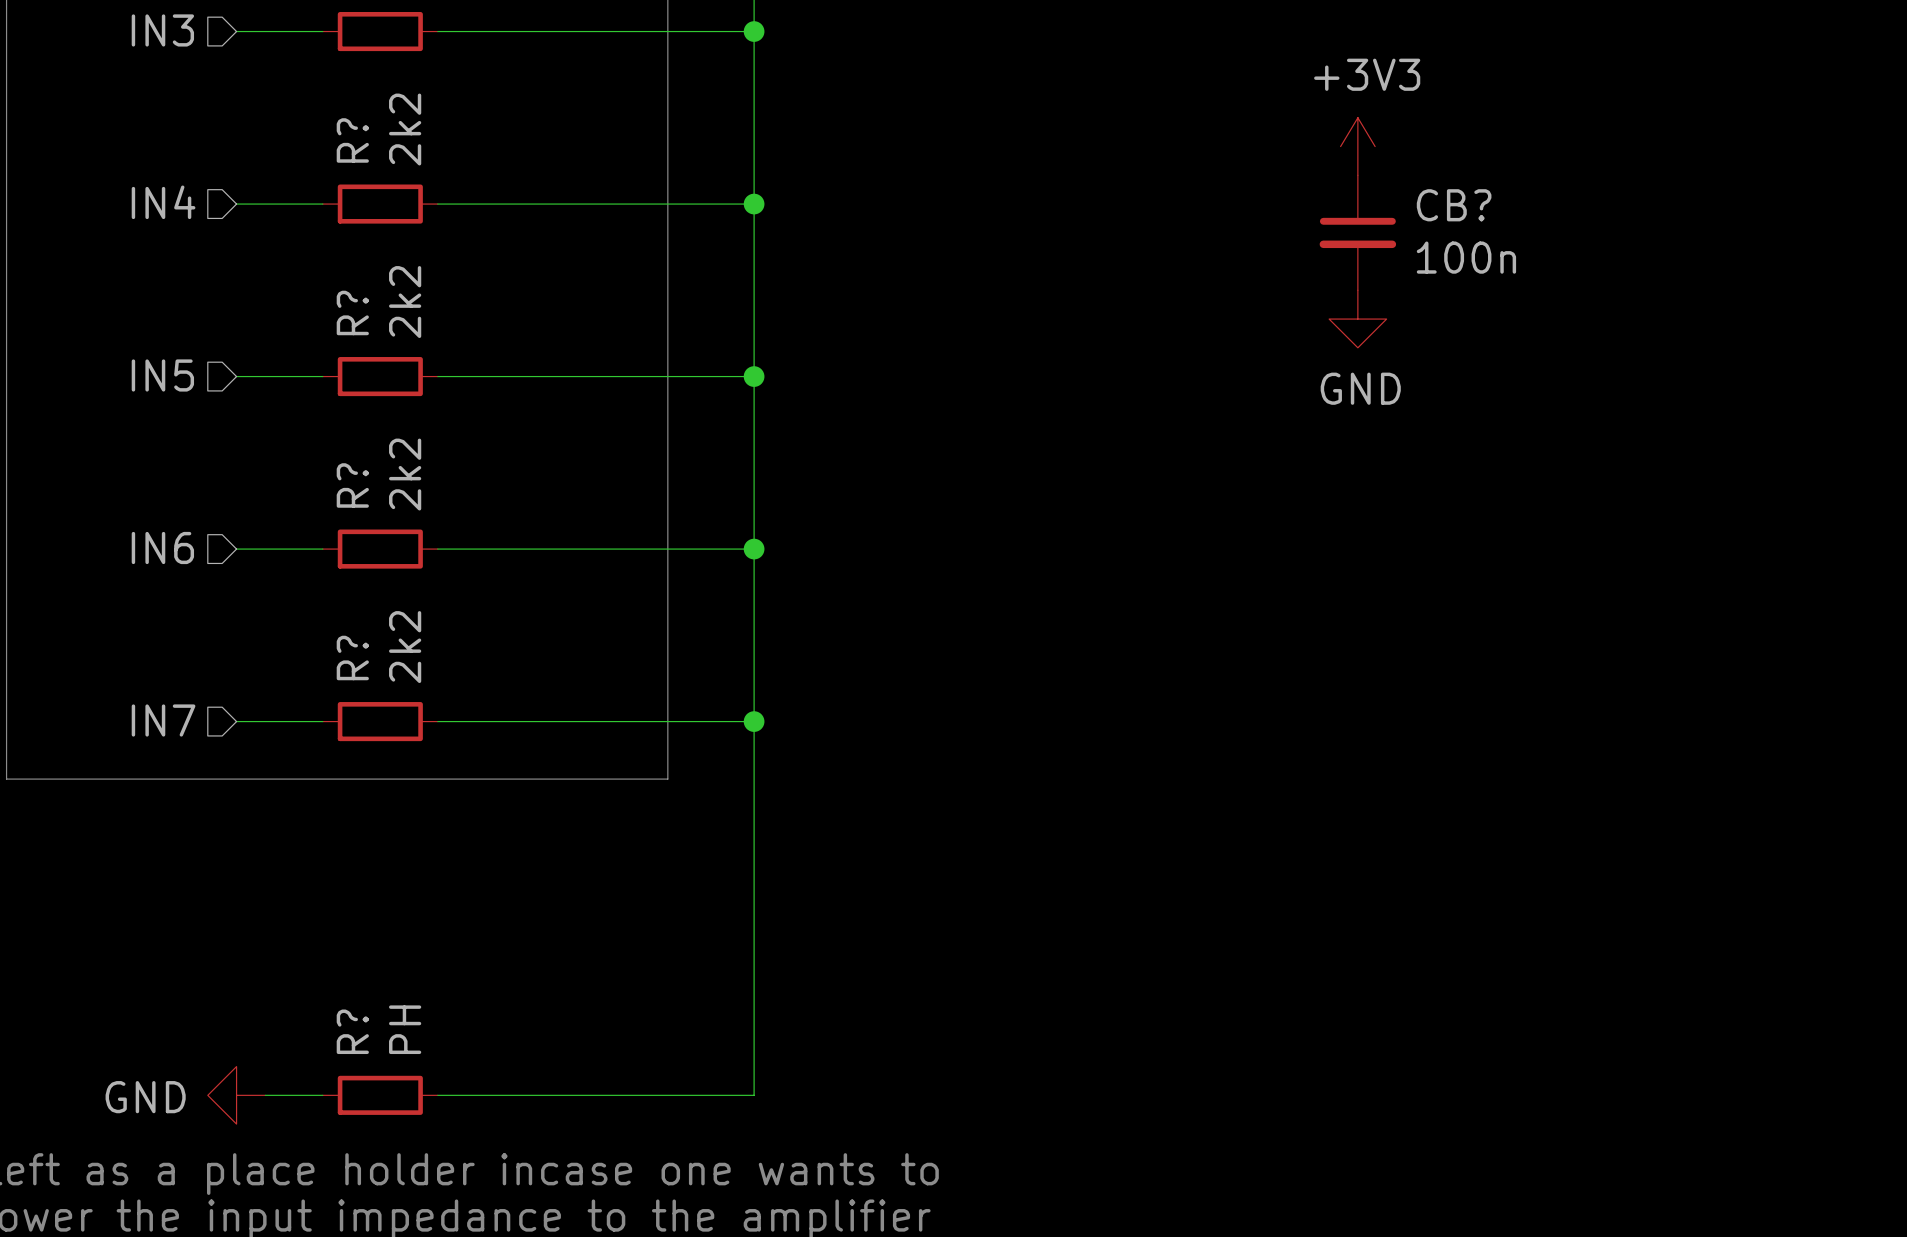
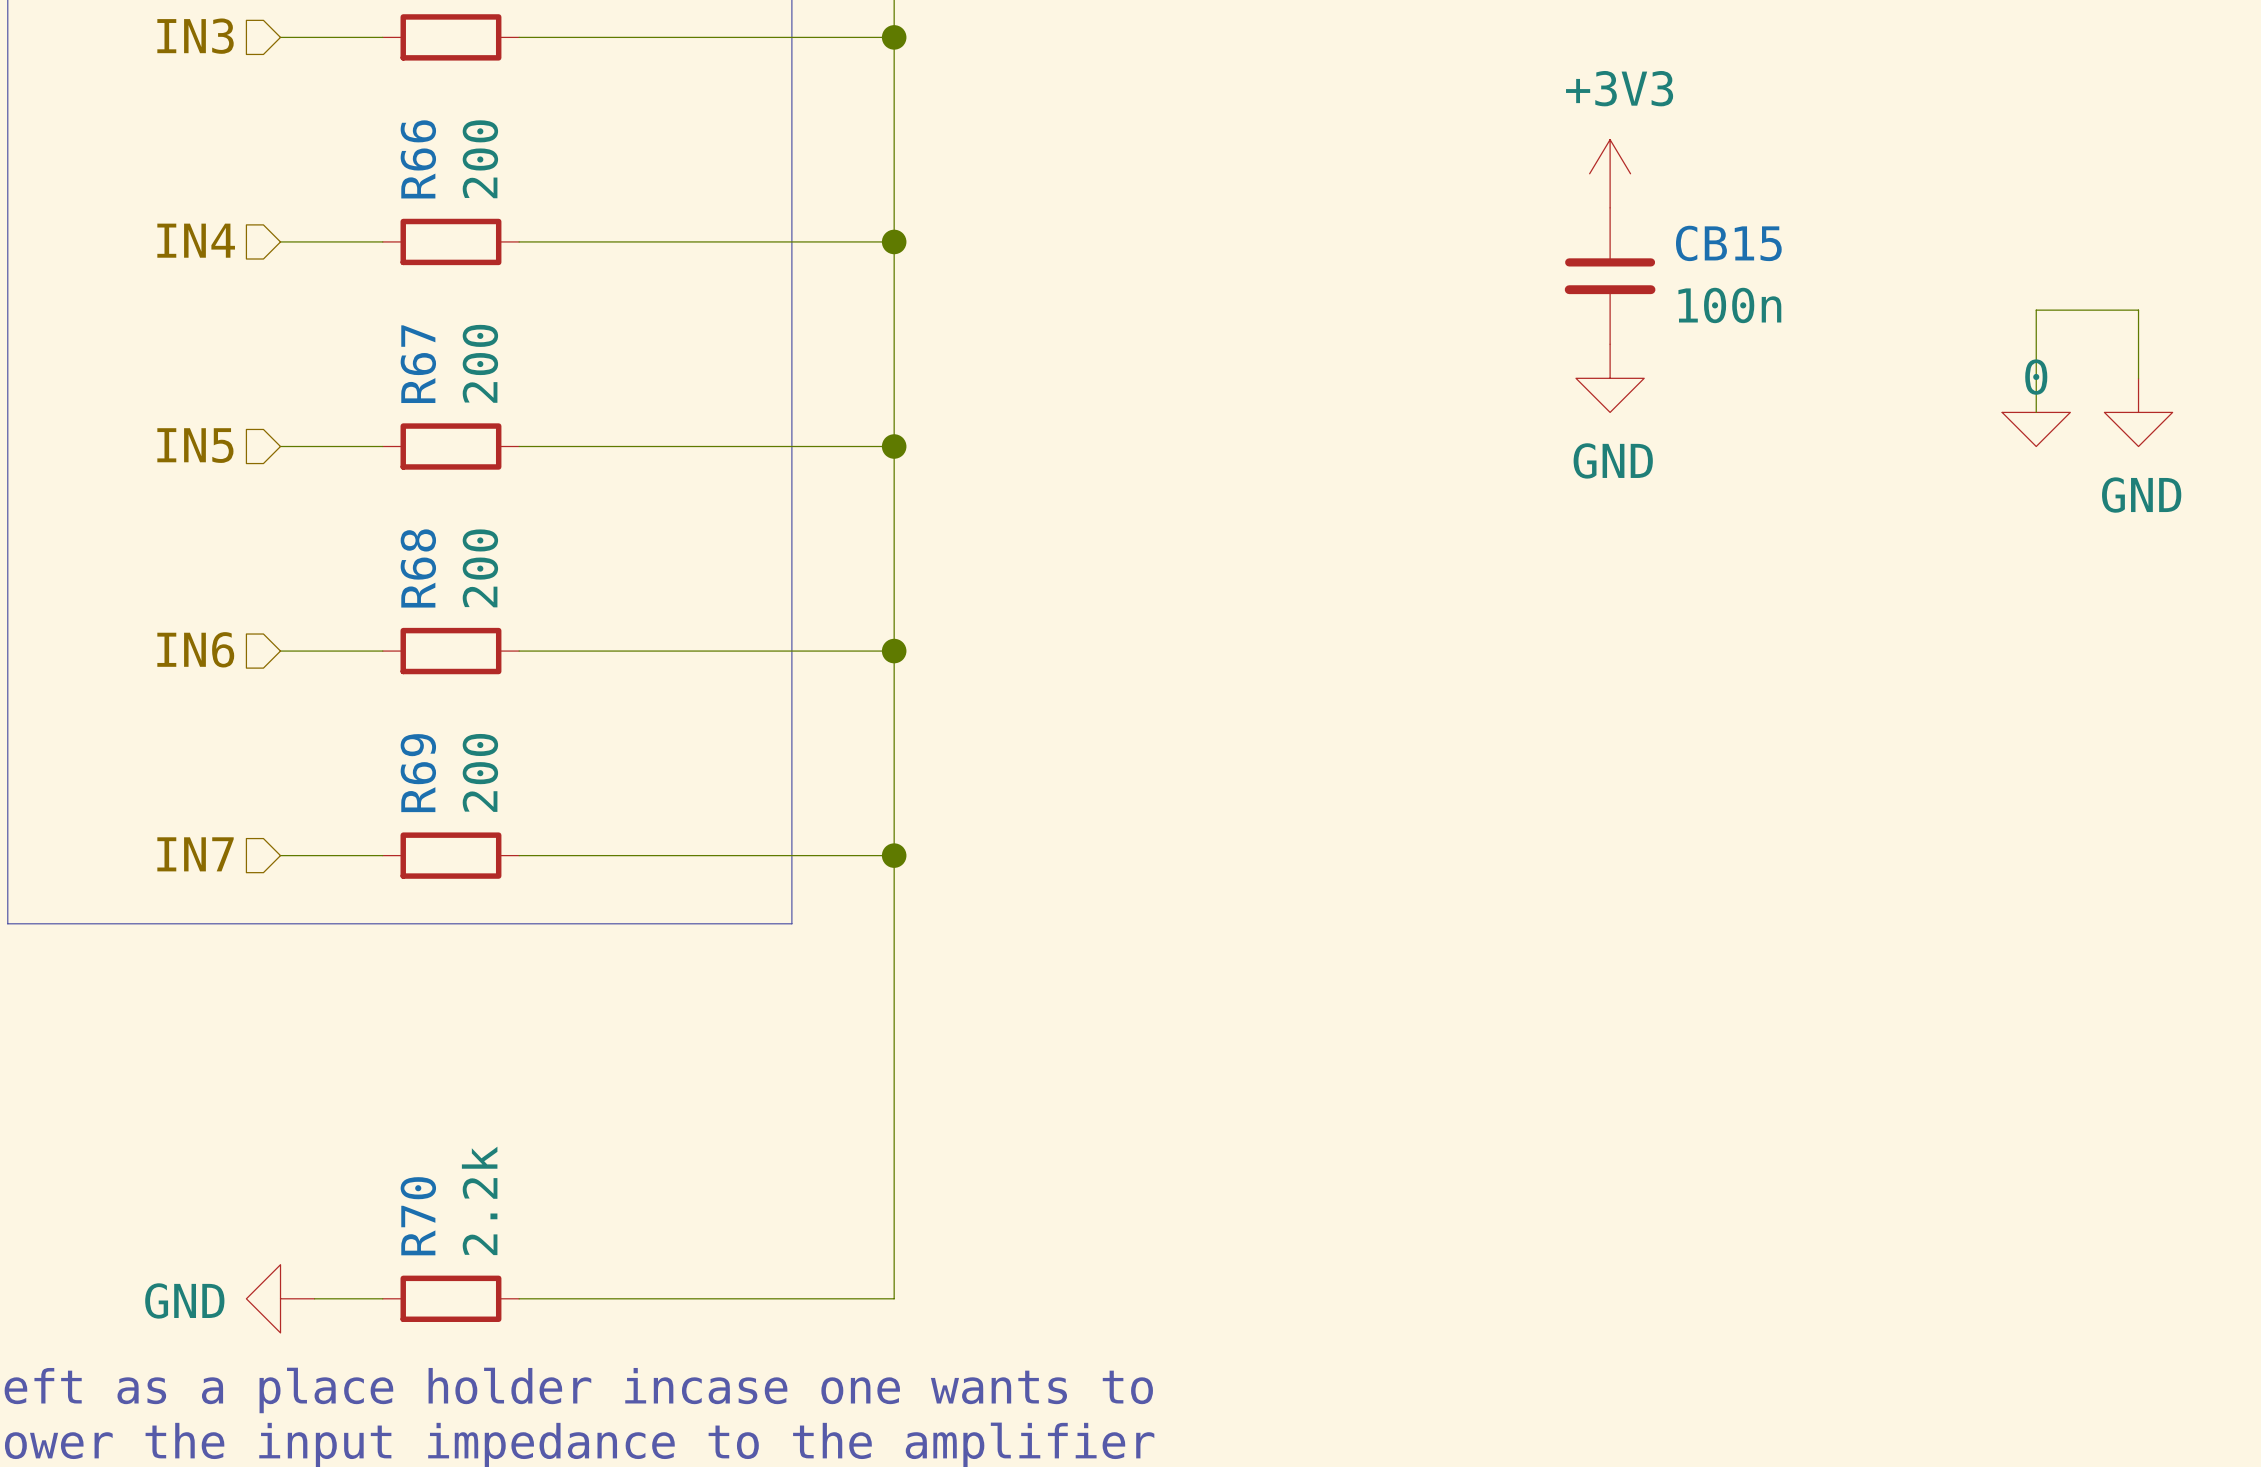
R? value: 2k2 (405, 129) -> 200 (480, 159)
R? name: R? (352, 140) -> R66 (418, 159)
CB? name: CB? (1454, 205) -> CB15 (1728, 243)
R? value: 2k2 (405, 302) -> 200 (480, 363)
R? name: R? (352, 312) -> R67 (418, 364)
wire: none -> (2138, 378) (2138, 310) (2036, 310) (2036, 412)
power symbol: none -> GND (2138, 412)
power symbol: none -> 0 (2036, 429)
R? value: 2k2 (405, 474) -> 200 (480, 568)
R? name: R? (352, 485) -> R68 (418, 568)
R? value: 2k2 (405, 647) -> 200 (480, 772)
R? name: R? (352, 658) -> R69 (418, 773)
R? value: PH (405, 1029) -> 2.2k (479, 1200)
R? name: R? (352, 1031) -> R70 (418, 1216)

